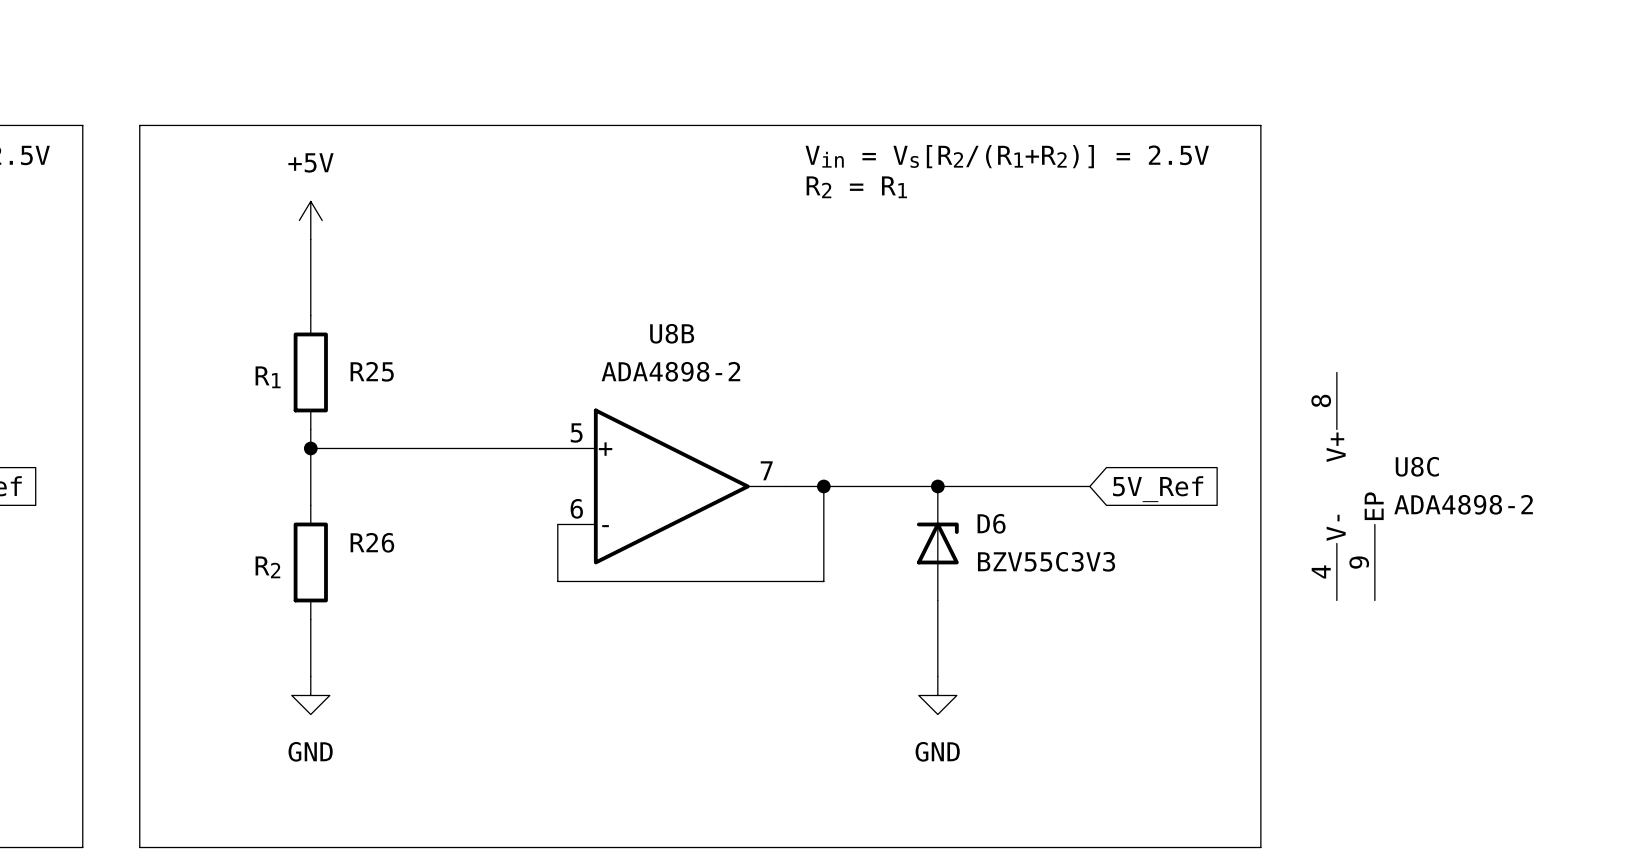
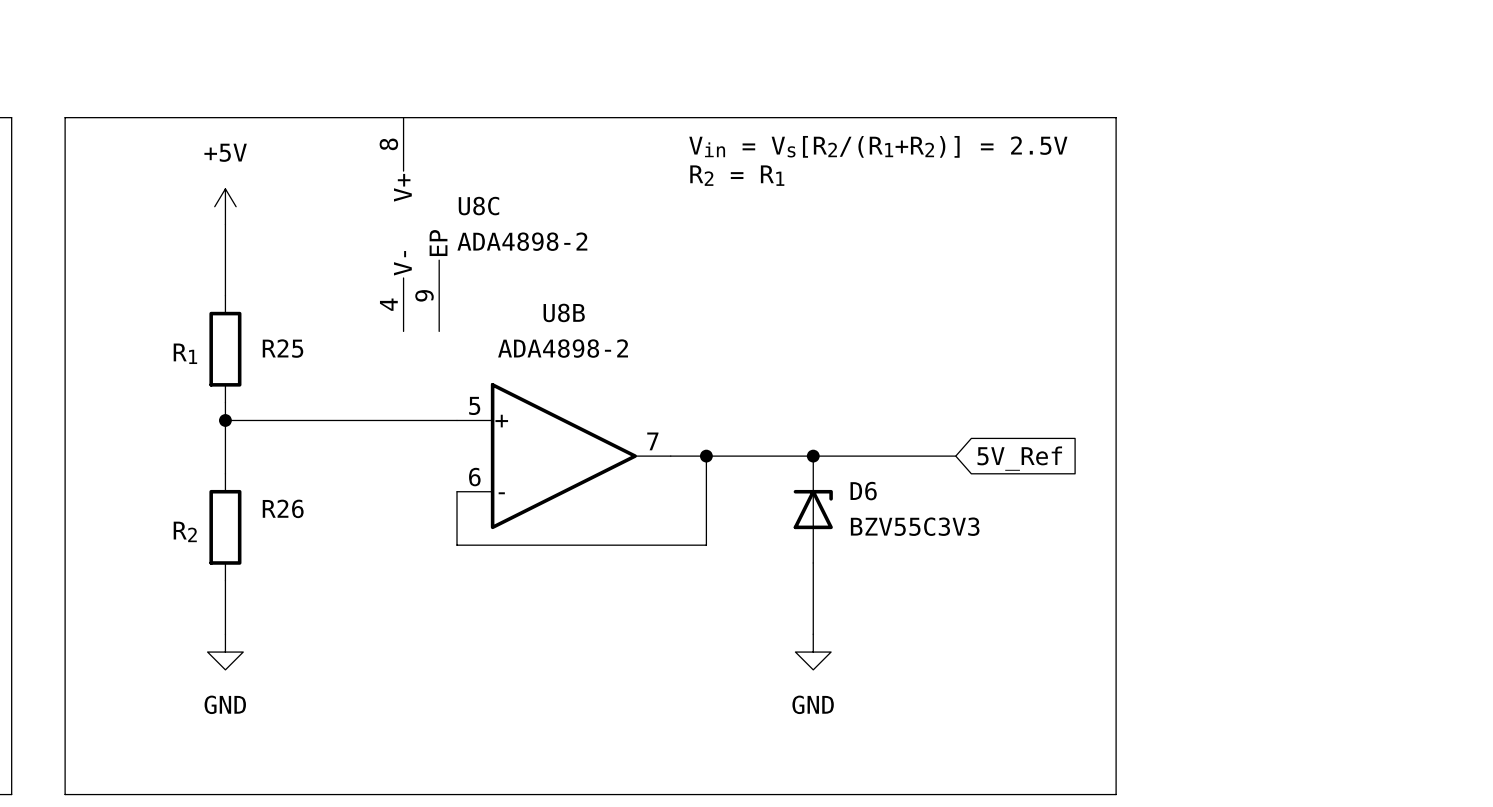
U8C position: (1355, 486) -> (421, 224)

